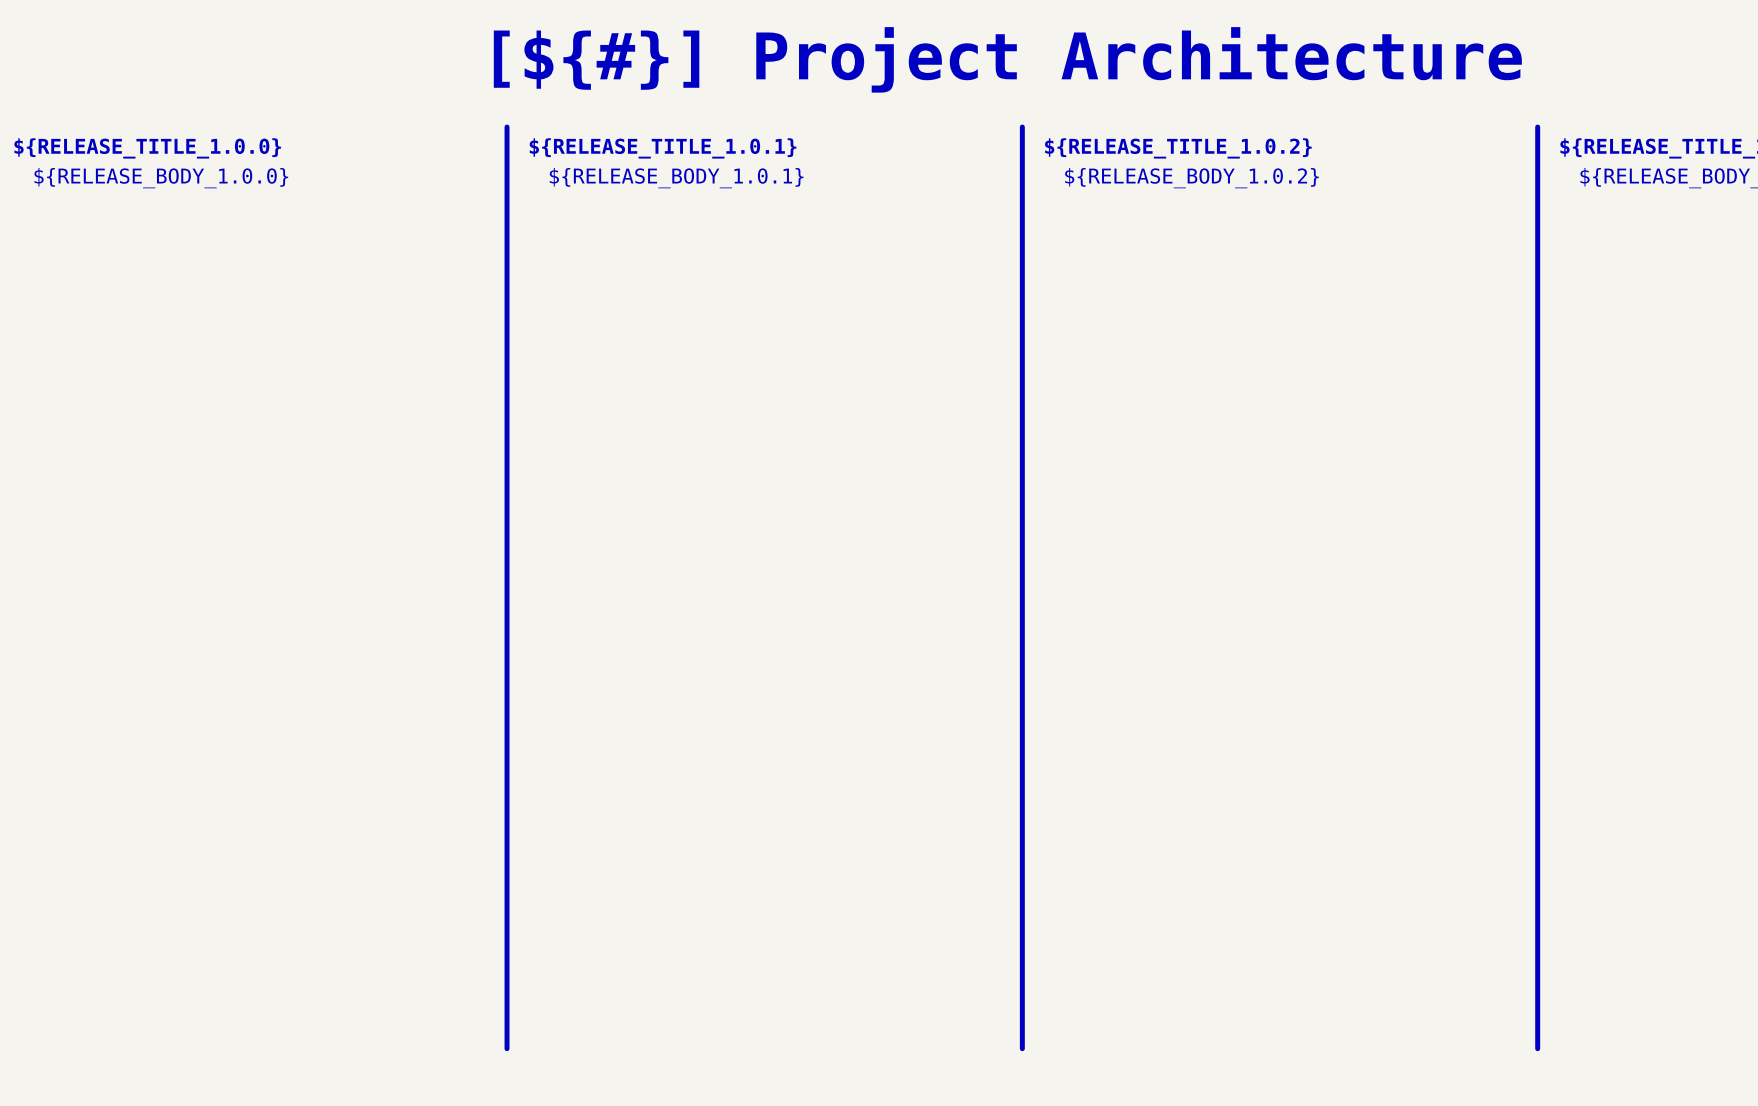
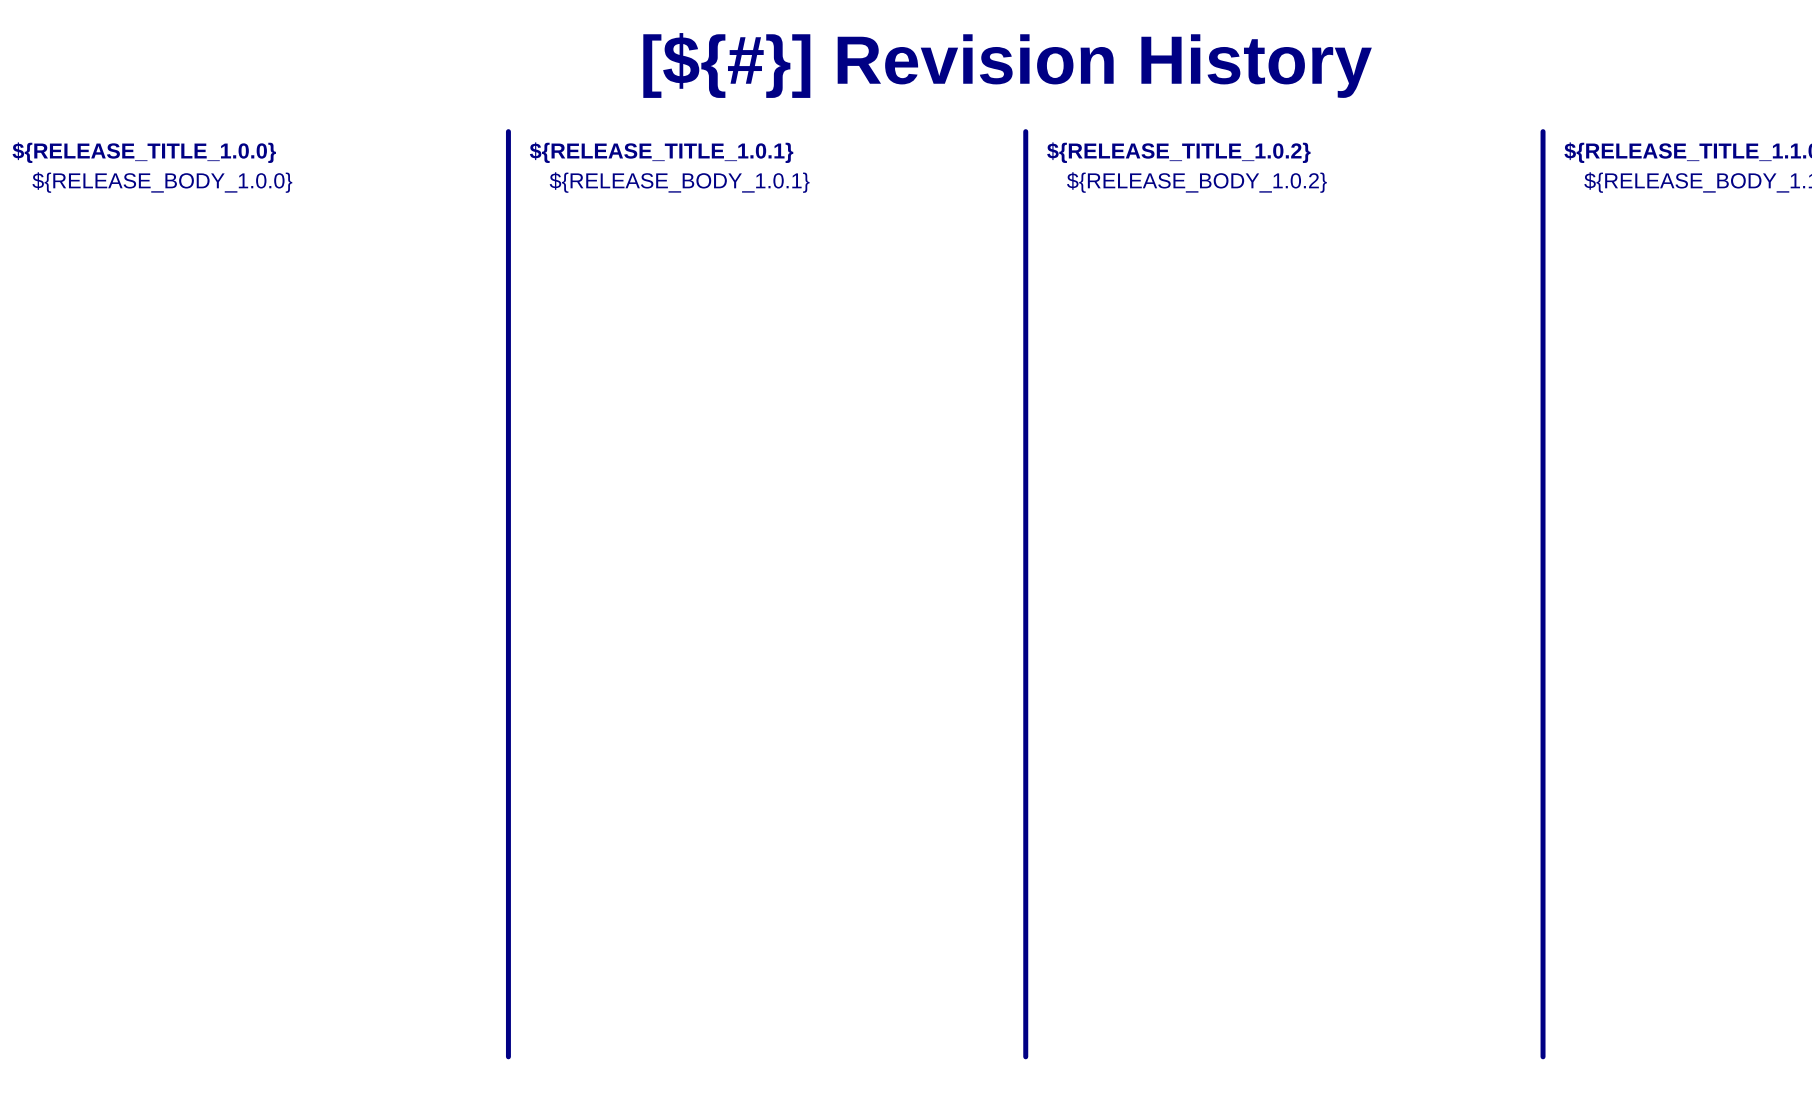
text: [${#}] Project Architecture (1007, 59) -> [${#}] Revision History (1007, 65)

